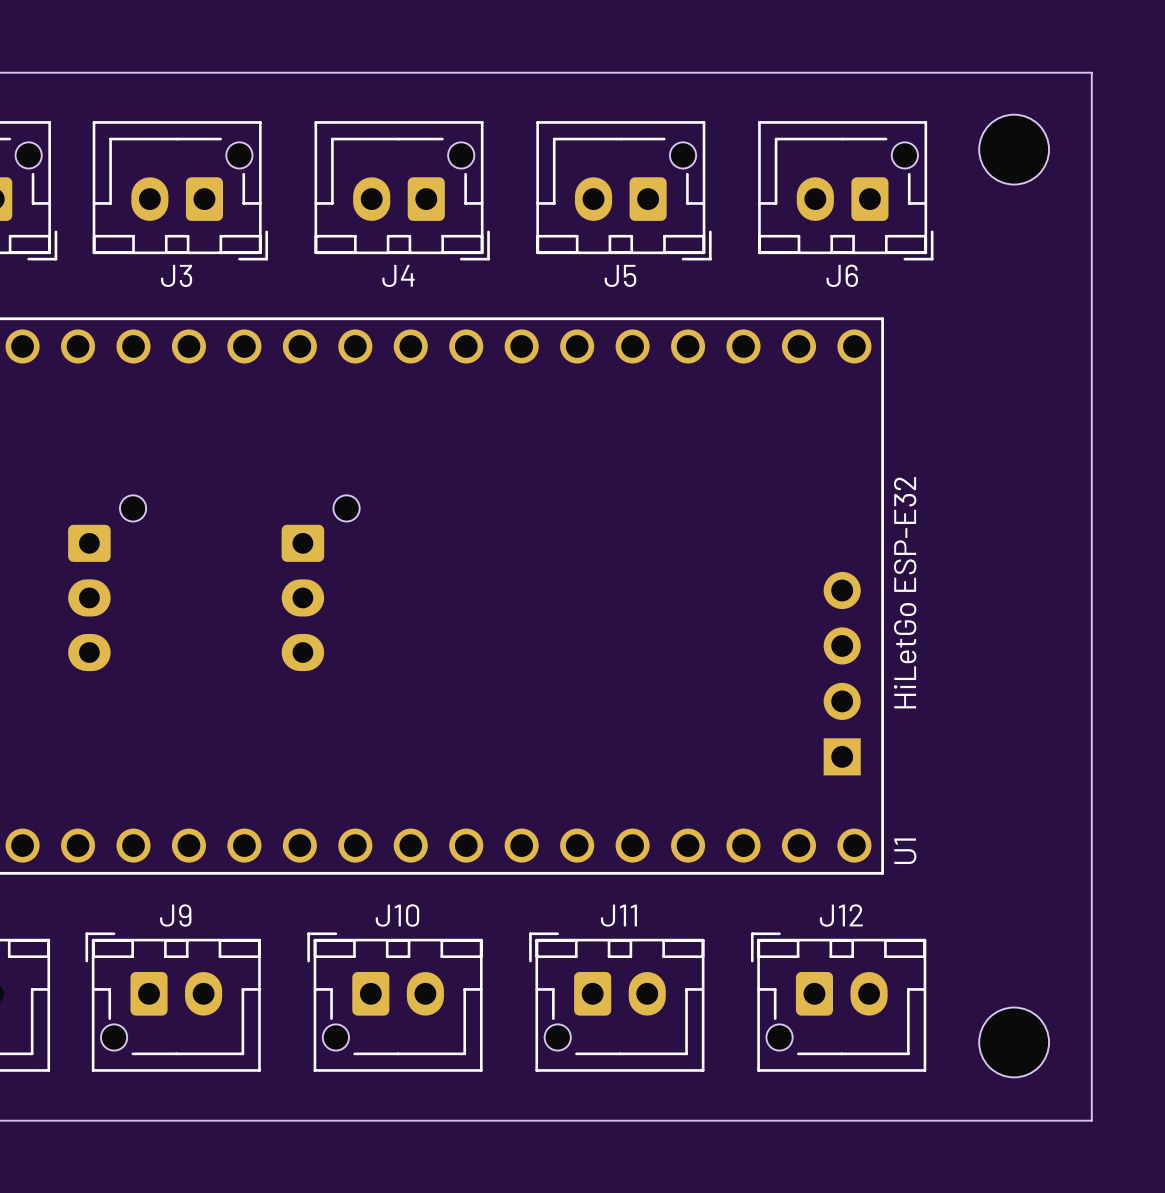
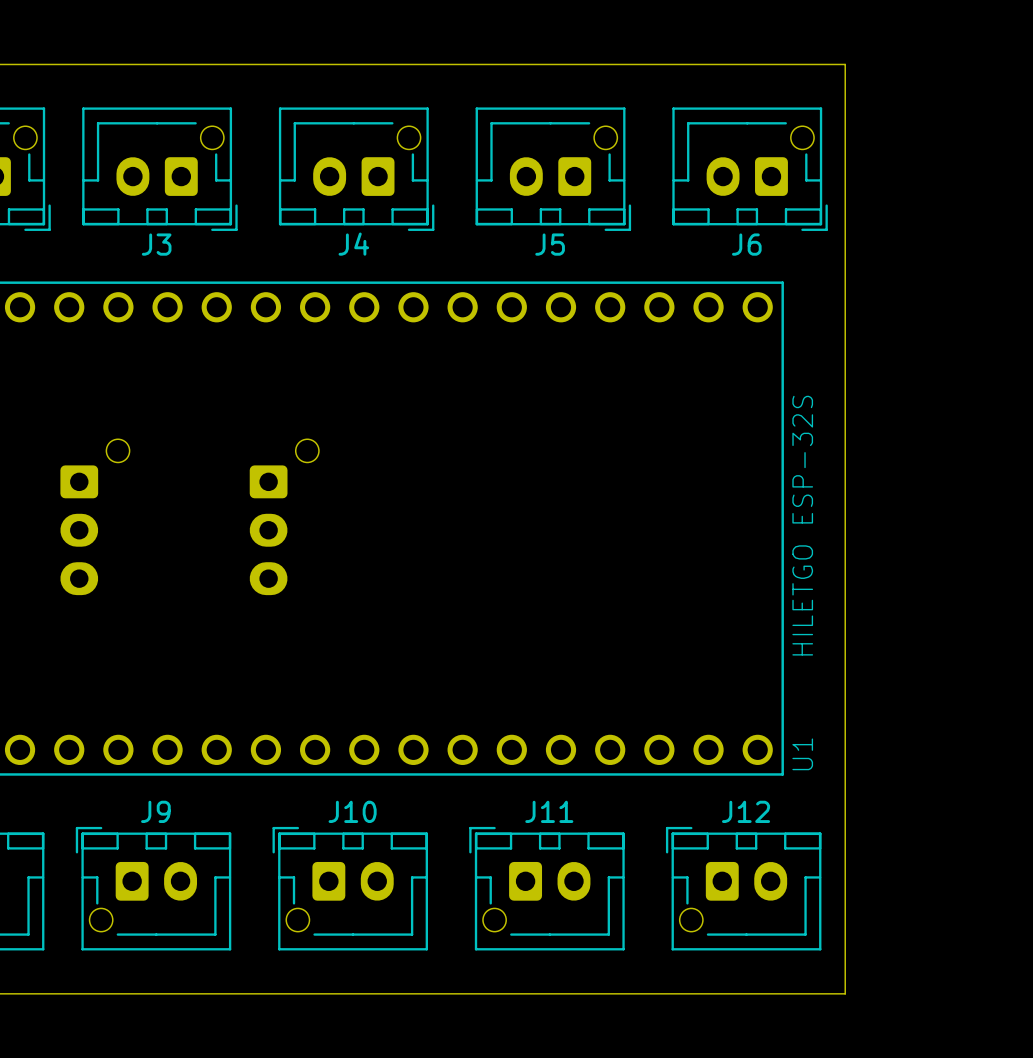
board edge: (953, 72) (1091, 72) (1091, 1120) (953, 1120) -> (845, 64) (845, 993)
part: (1014, 149) -> none
U1 value: HiLetGo ESP-E32 (905, 592) -> HILETGO ESP-32S (802, 525)
part: (842, 673) -> none
part: (1014, 1042) -> none

